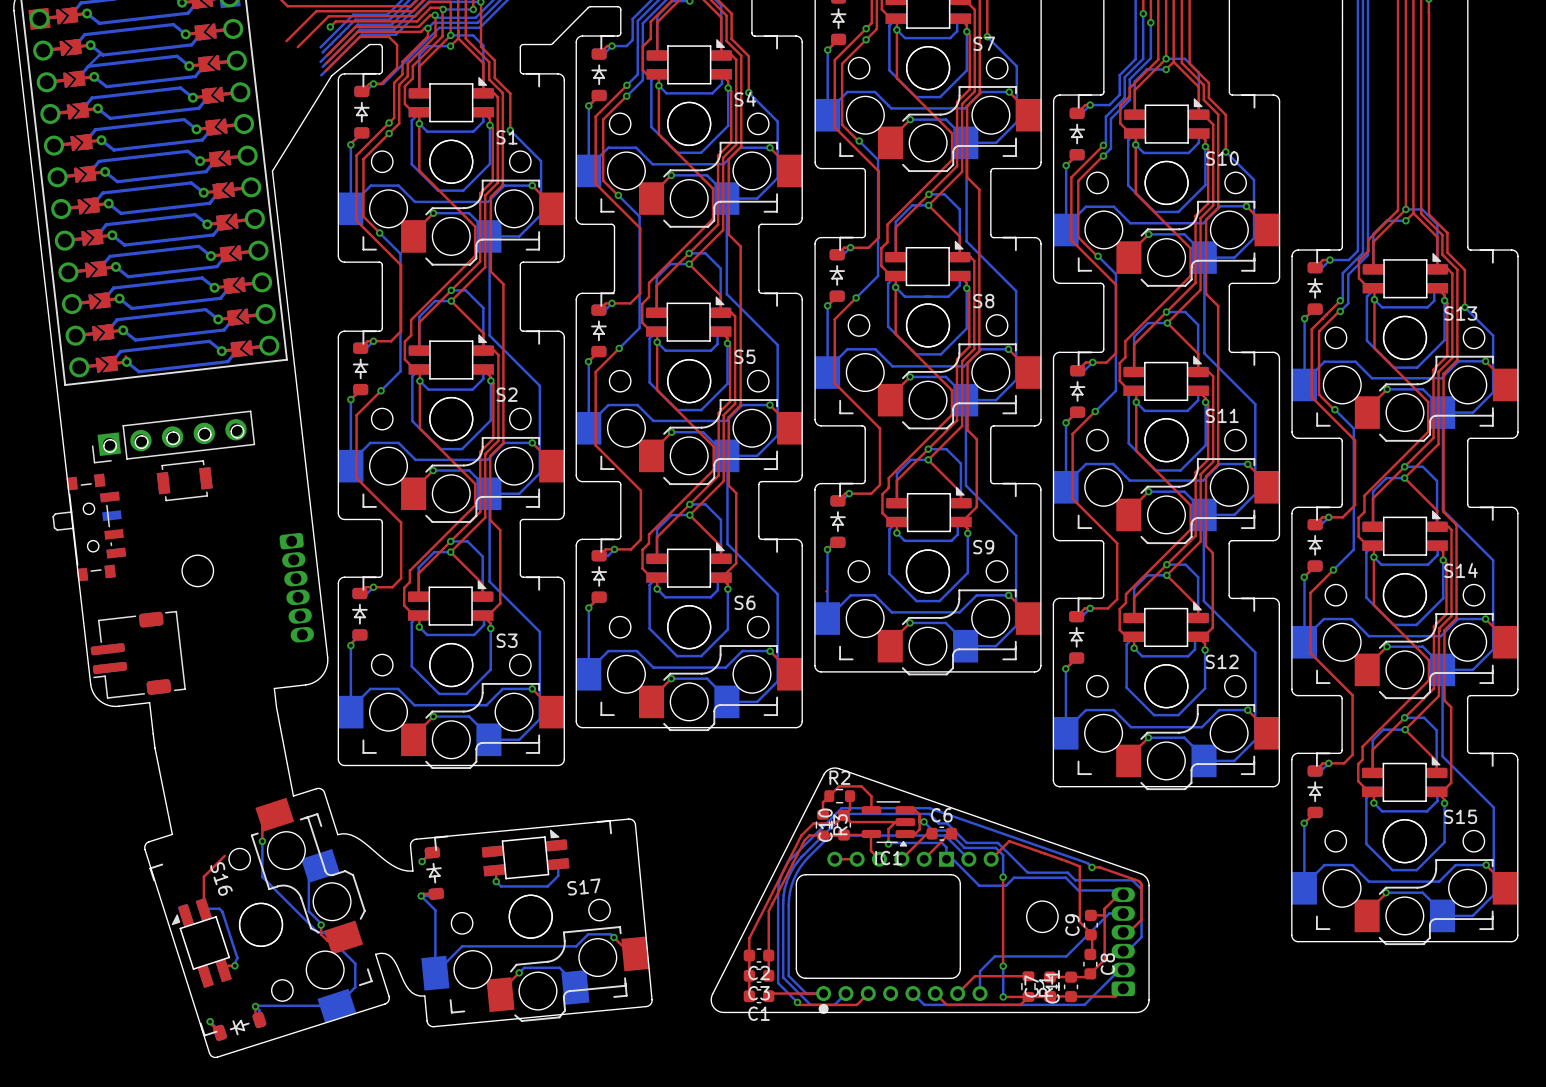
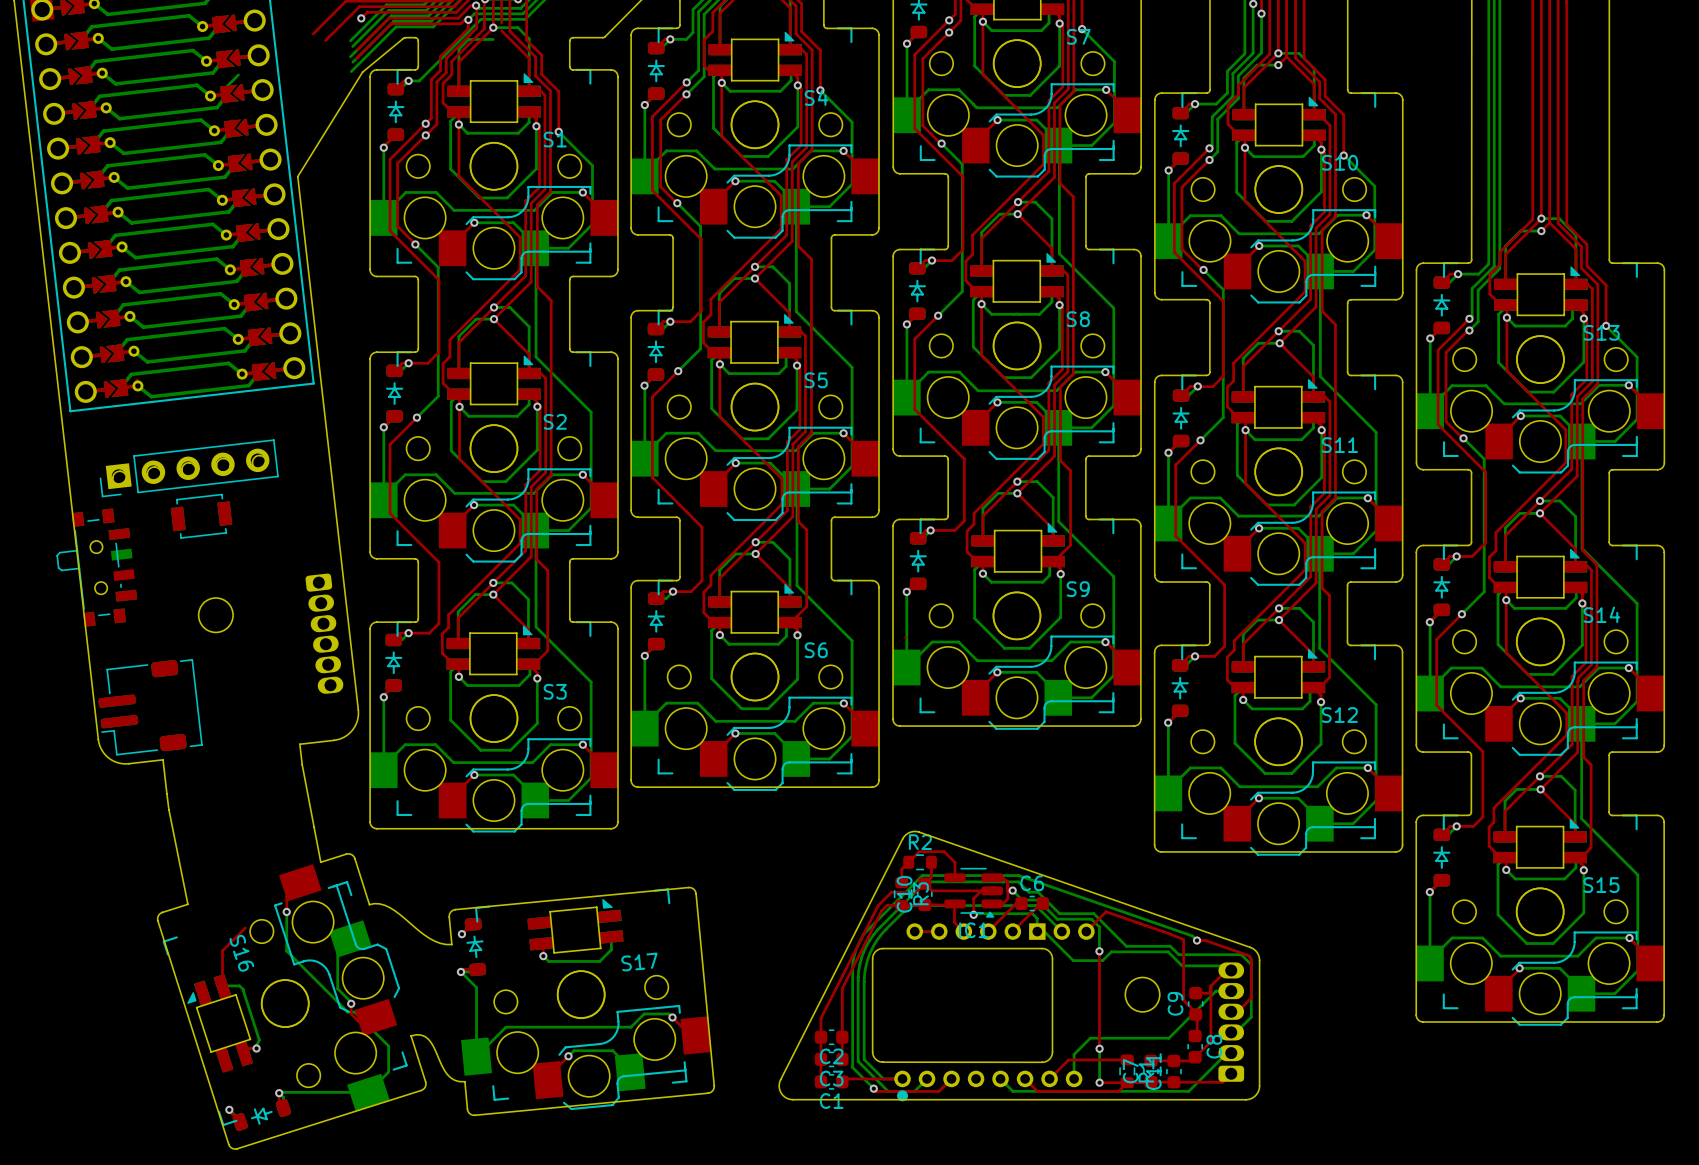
top track: (458, 31) (458, 38) (450, 46) -> none
via: (450, 46) -> none
bottom track: (103, 55) (99, 55) (88, 66) -> none
top track: (325, 71) (359, 36) (388, 36) (397, 45) (397, 68) (381, 83) (373, 83) -> none
bottom track: none -> (238, 74) (224, 88)

